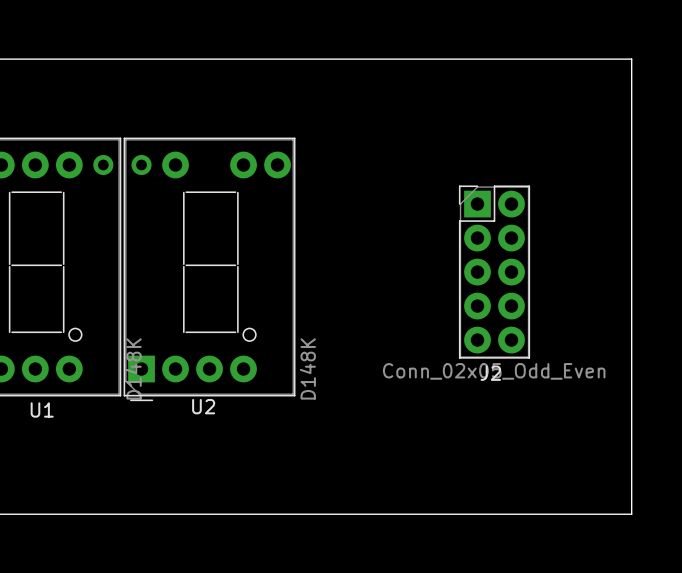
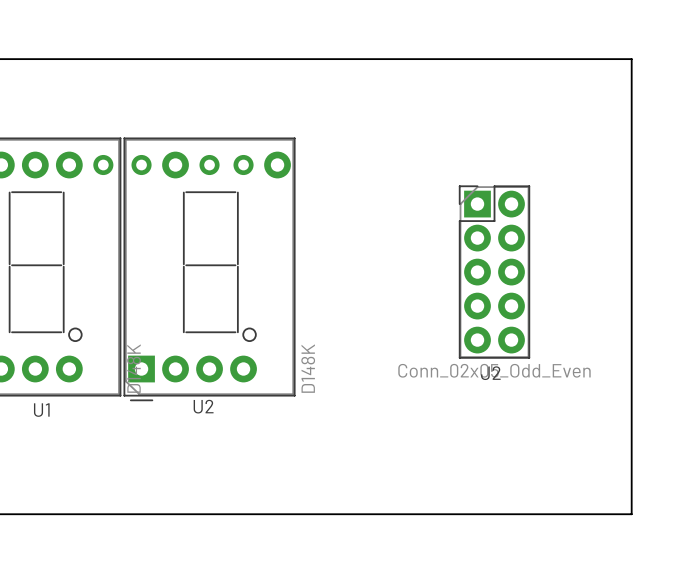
U2 footprint: [123, 137, 296, 402] -> [123, 137, 296, 402]

